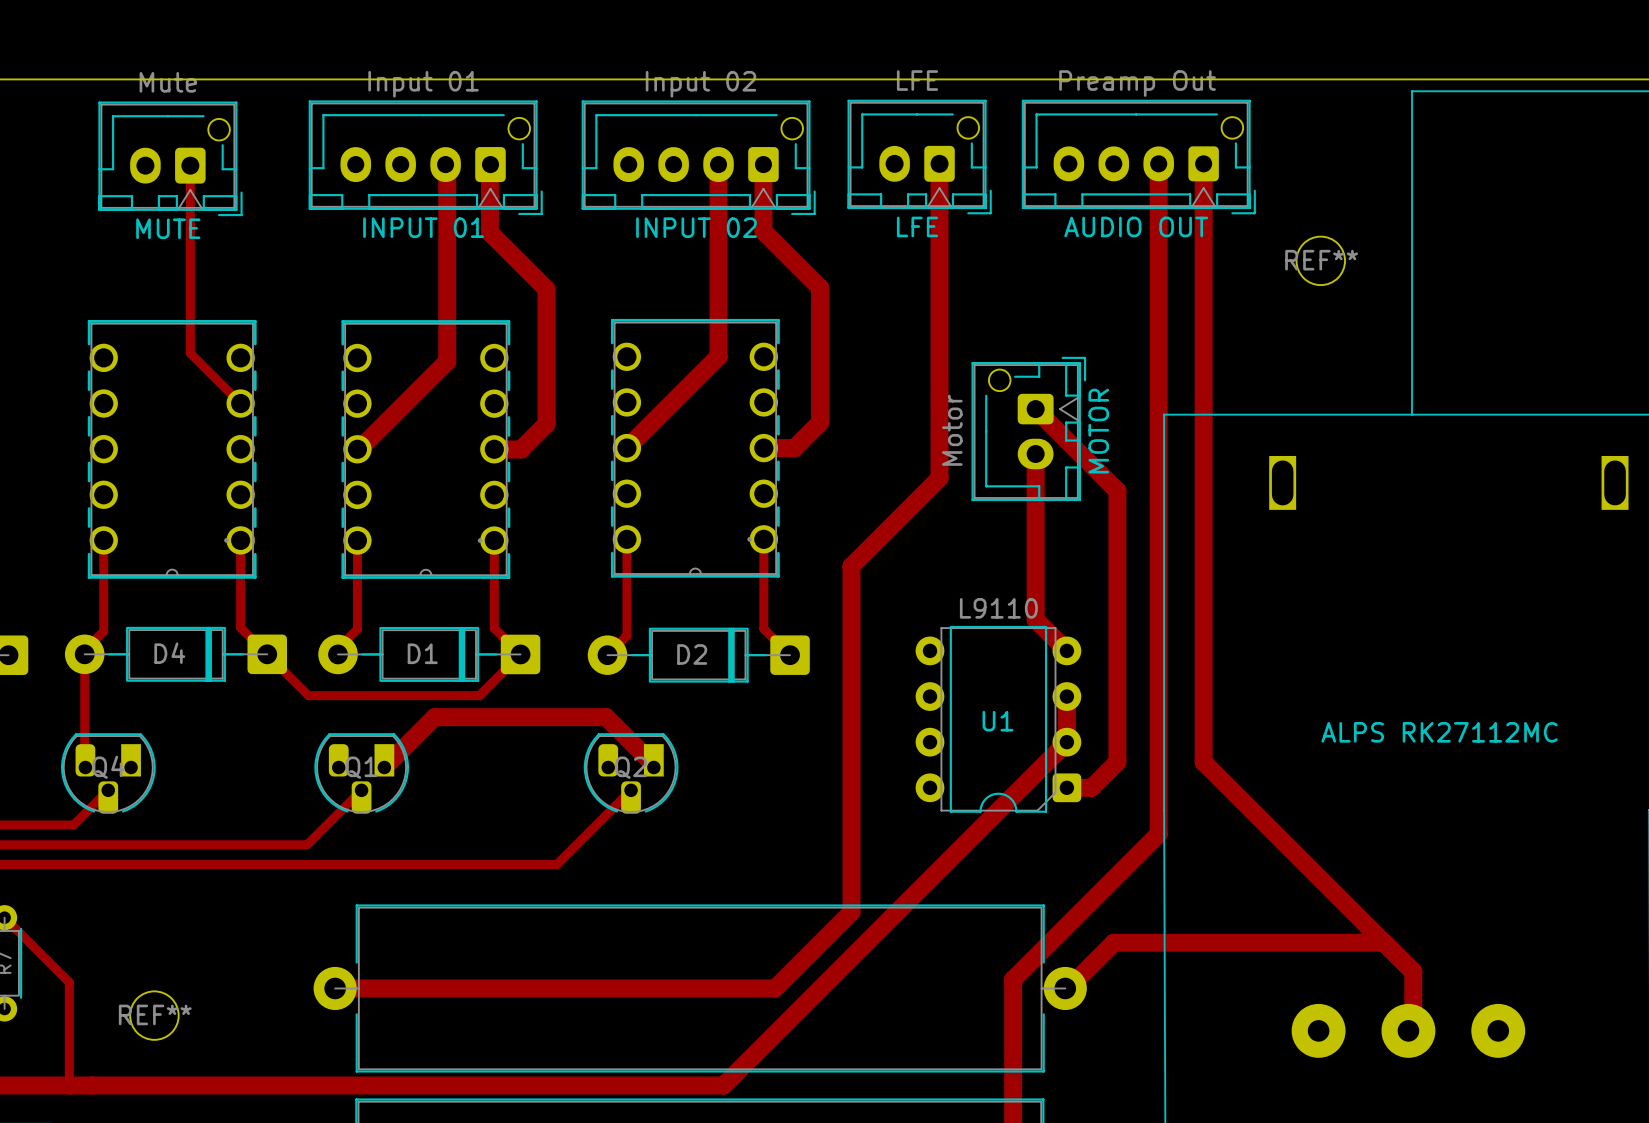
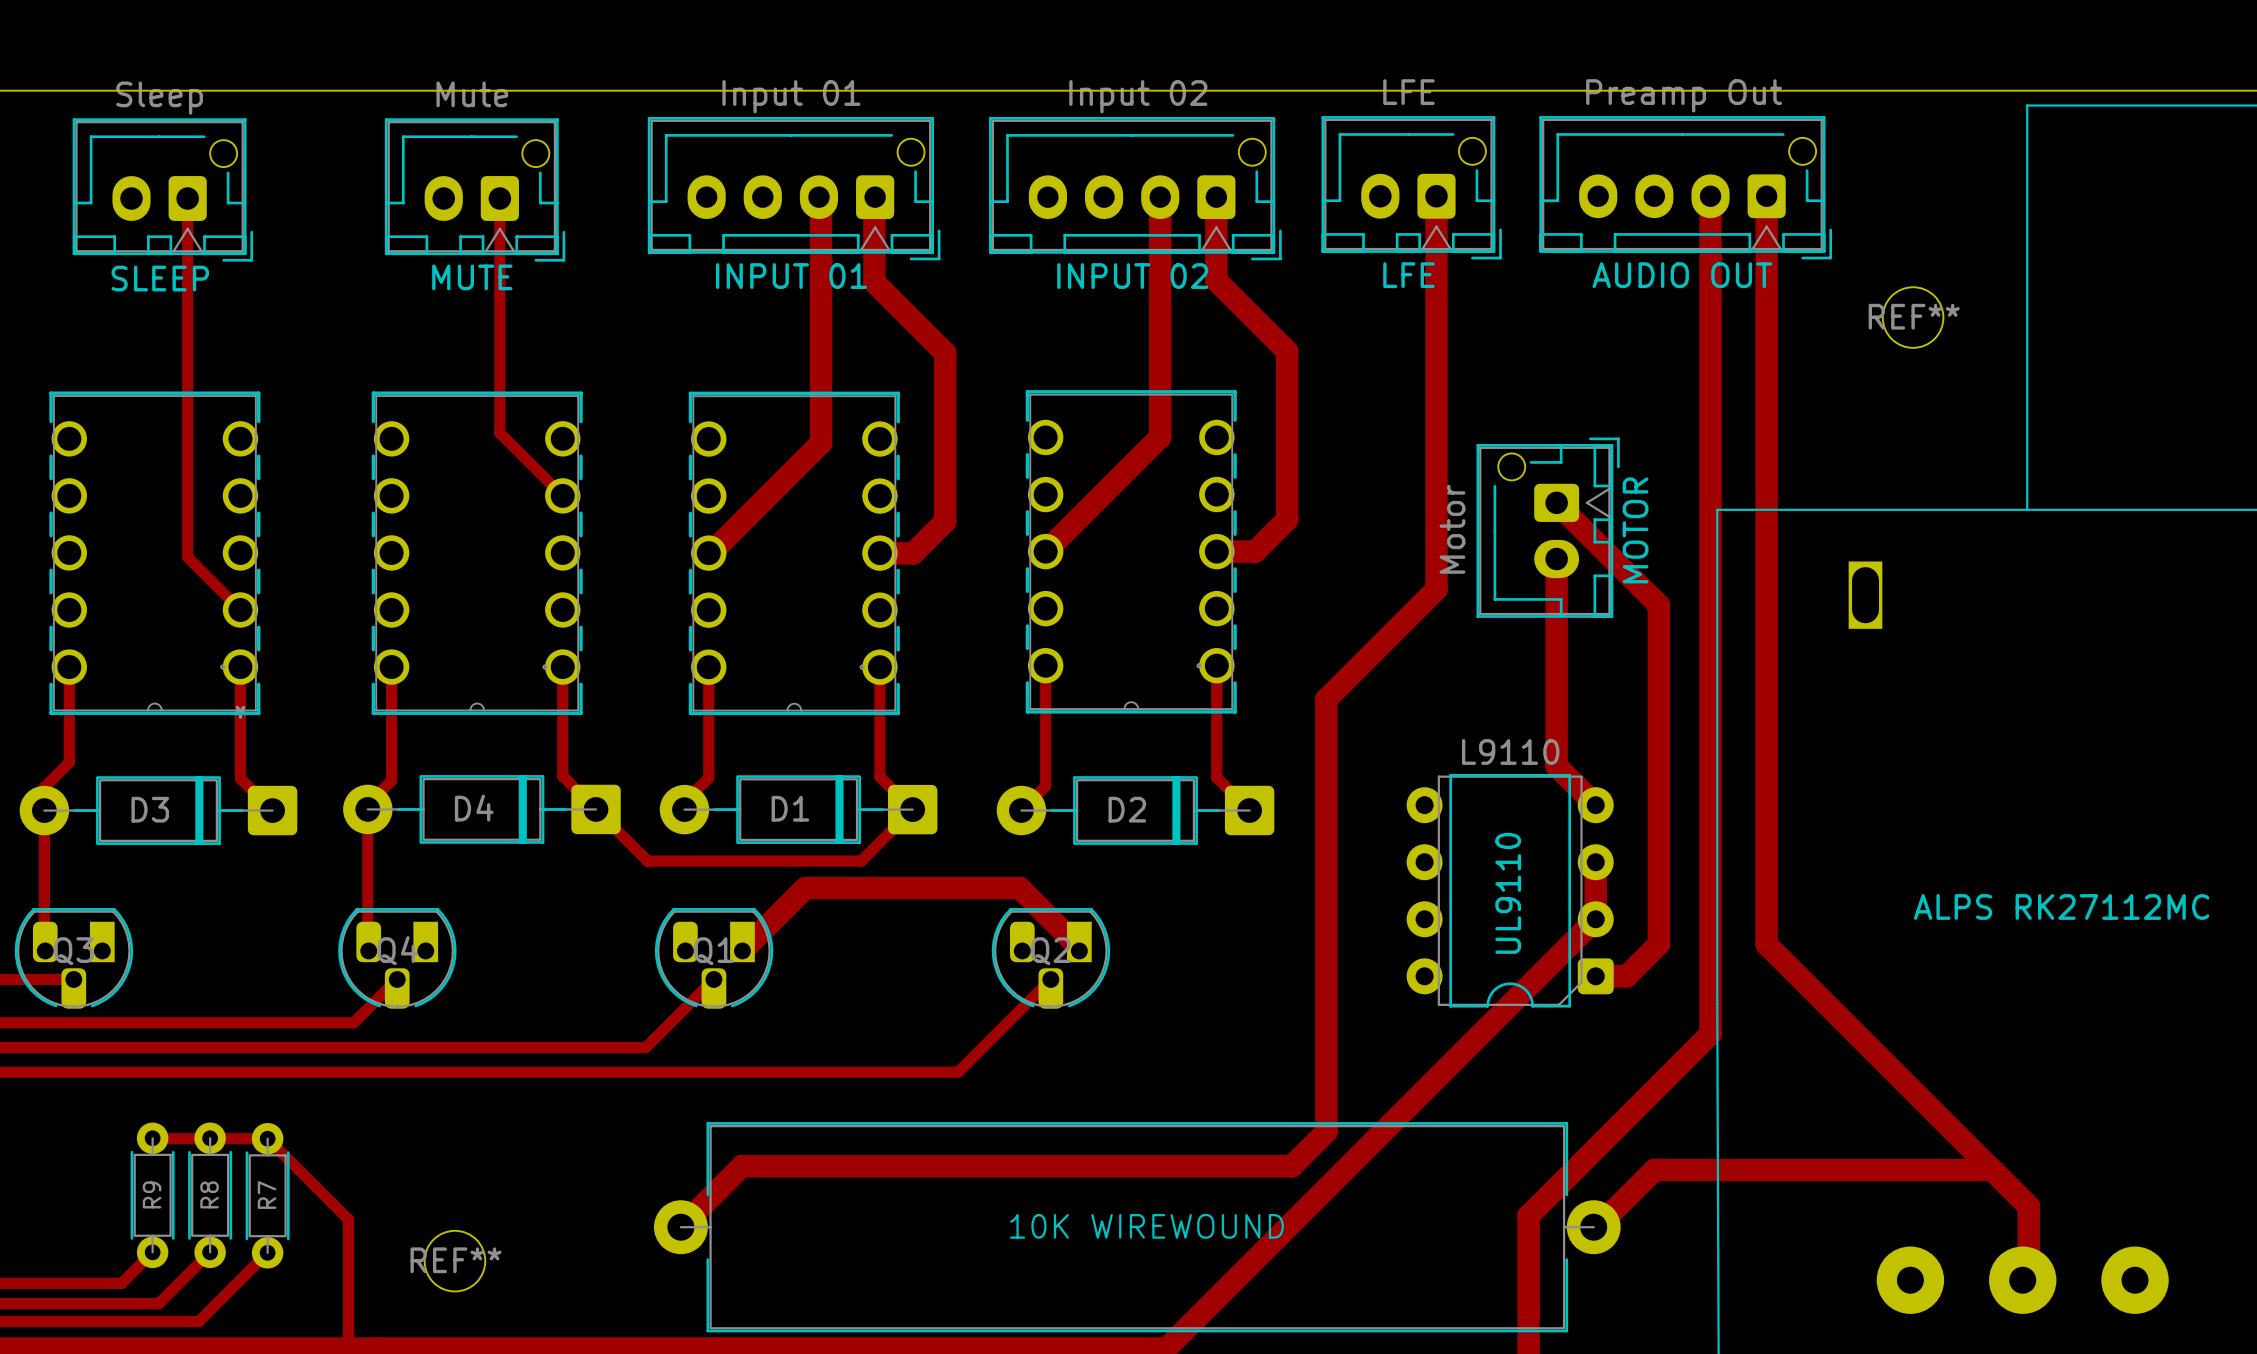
U1 name: U1 (997, 721) -> UL9110 (1508, 893)
track: (823, 939) (775, 988) (335, 988) -> (1291, 1166) (741, 1166) (680, 1227)
part text: none -> 10K WIREWOUND (1146, 1226)

